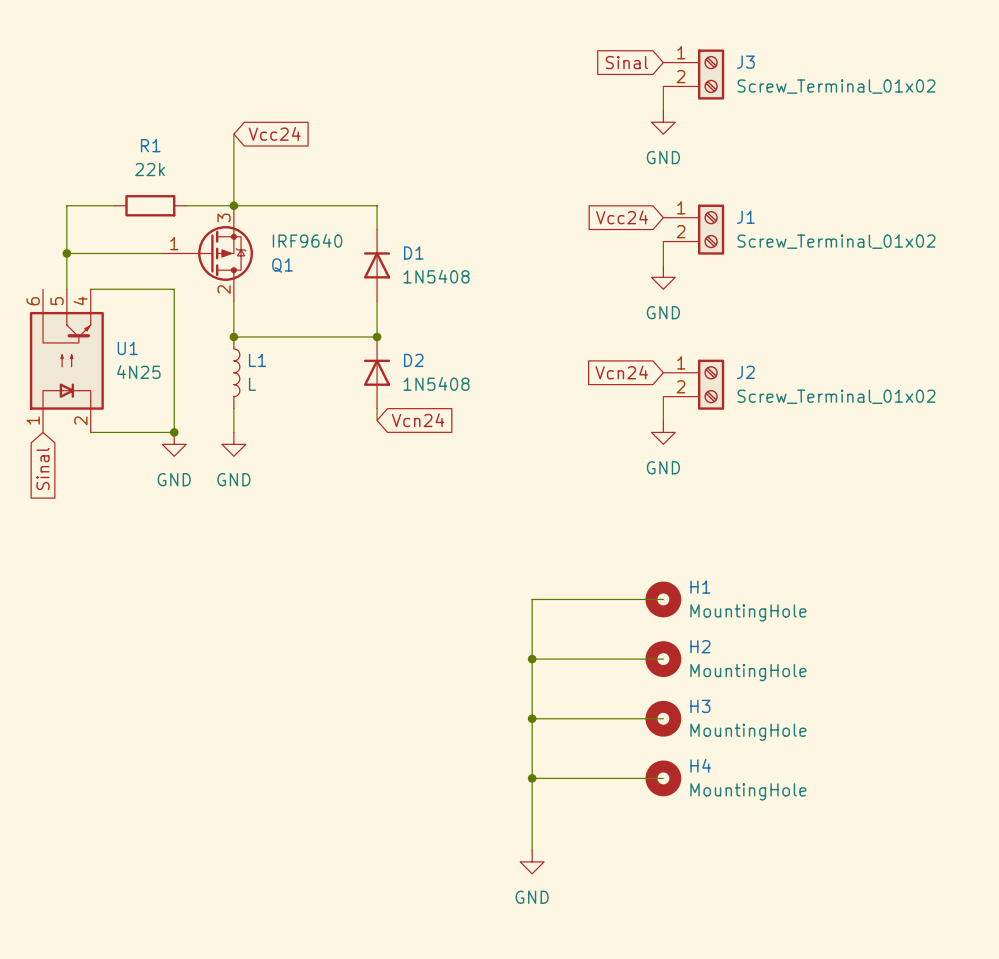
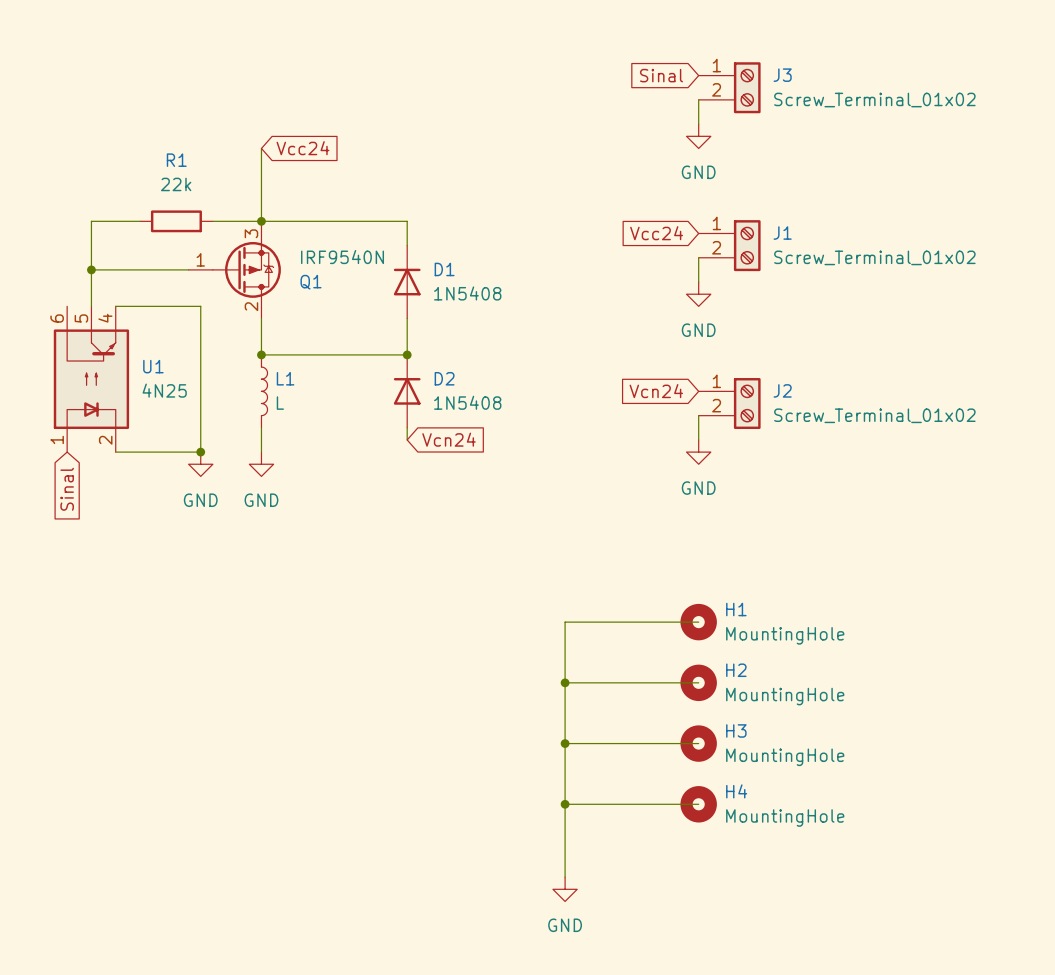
Q1 value: IRF9640 (307, 240) -> IRF9540N (342, 257)

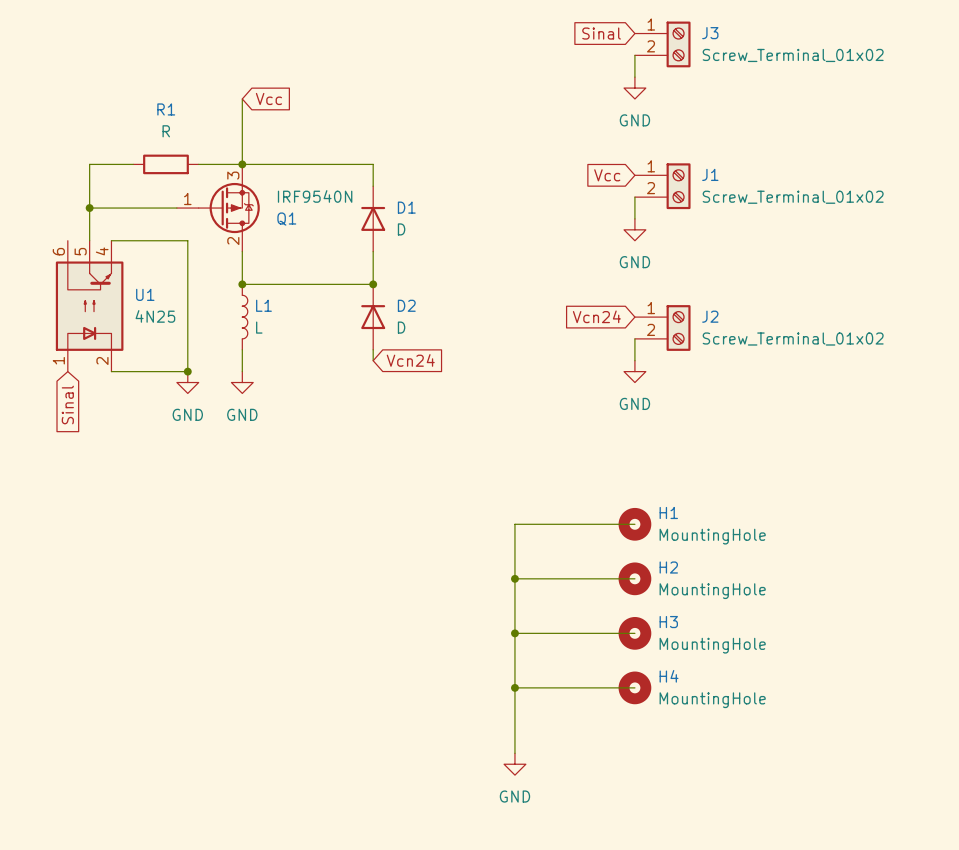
global label: Vcc24 (302, 148) -> Vcc (268, 98)
R1 value: 22k (176, 184) -> R (166, 131)
global label: Vcc24 (656, 233) -> Vcc (607, 175)
D1 value: 1N5408 (467, 293) -> D (401, 229)
D2 value: 1N5408 (467, 402) -> D (401, 327)

